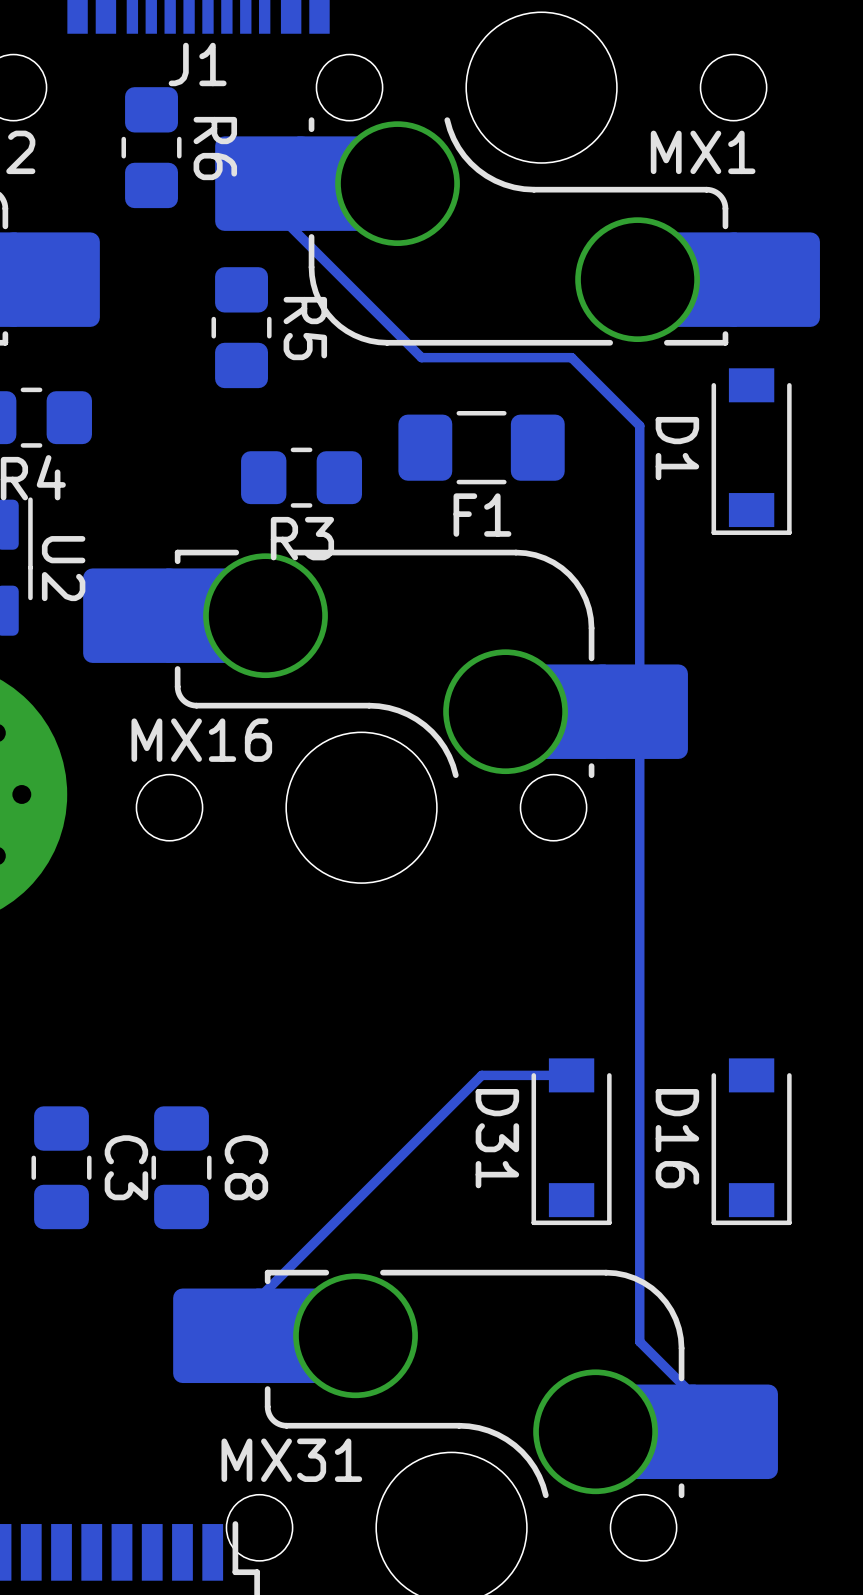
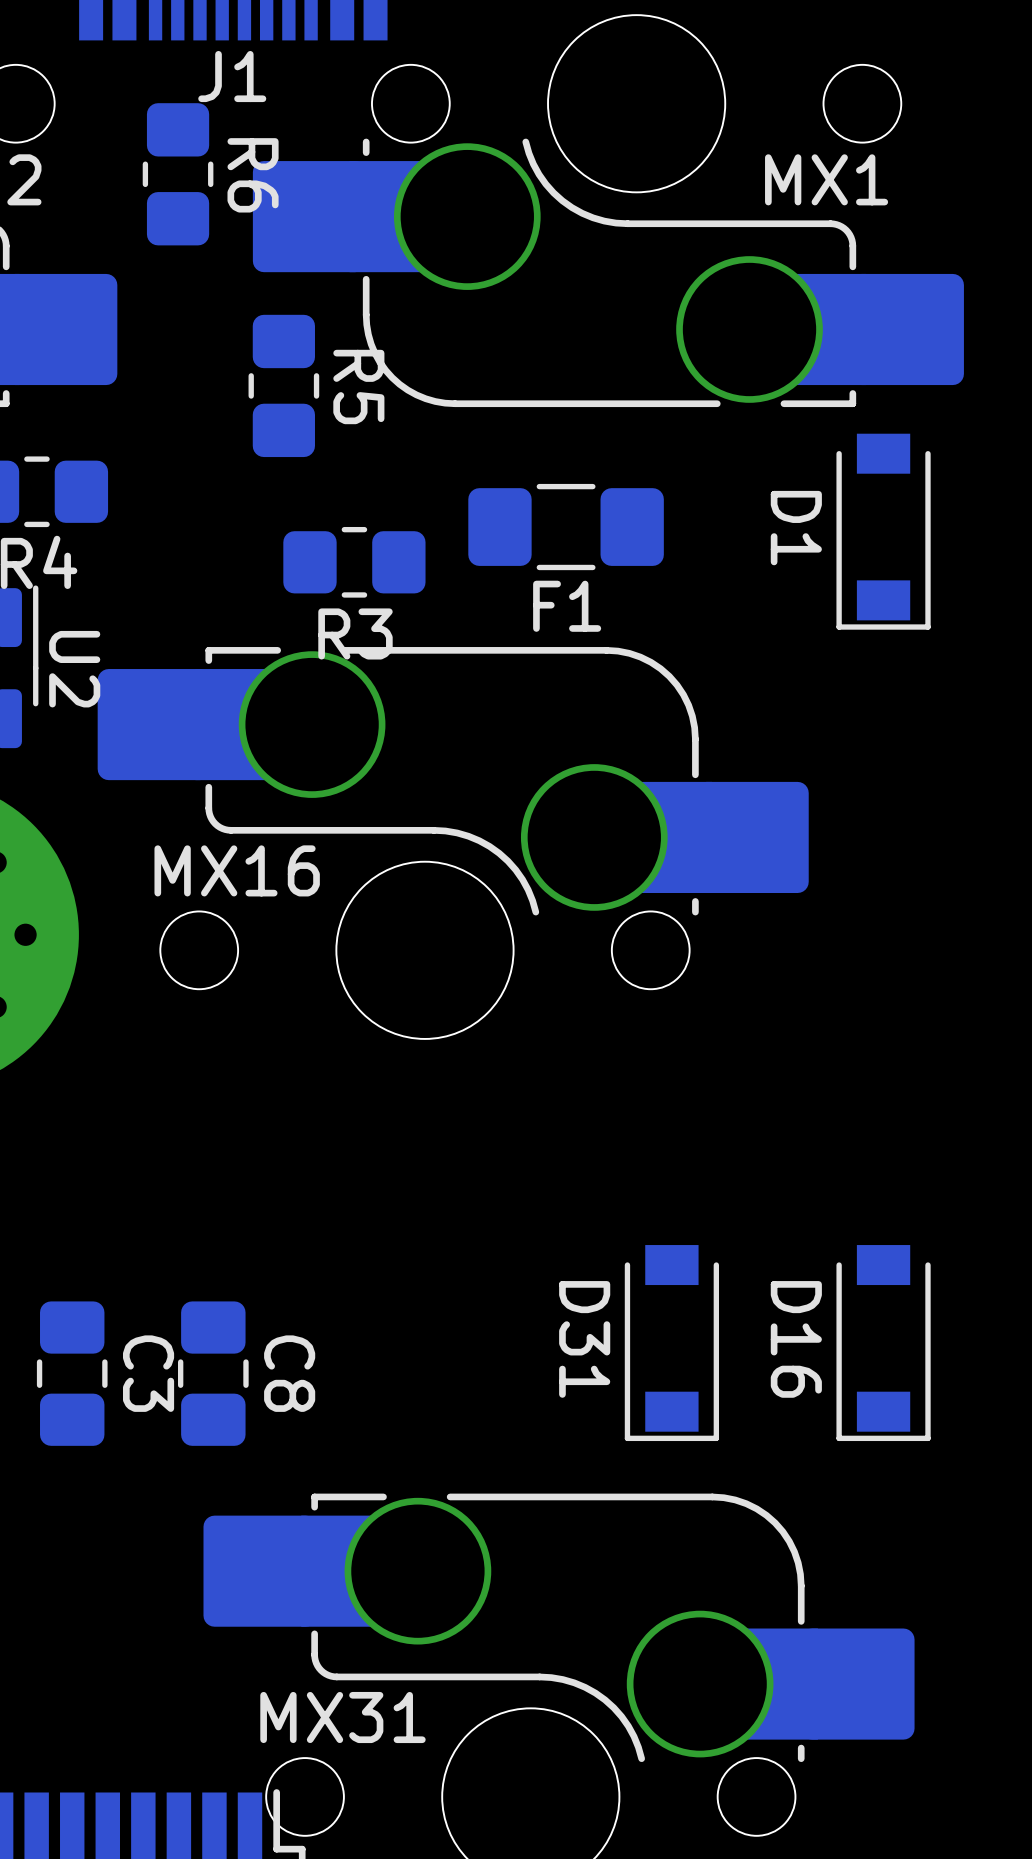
track: (263, 183) (263, 199) (421, 357) (571, 357) (639, 425) (639, 1341) (729, 1431) -> none
track: (571, 1075) (481, 1075) (221, 1335) -> none

